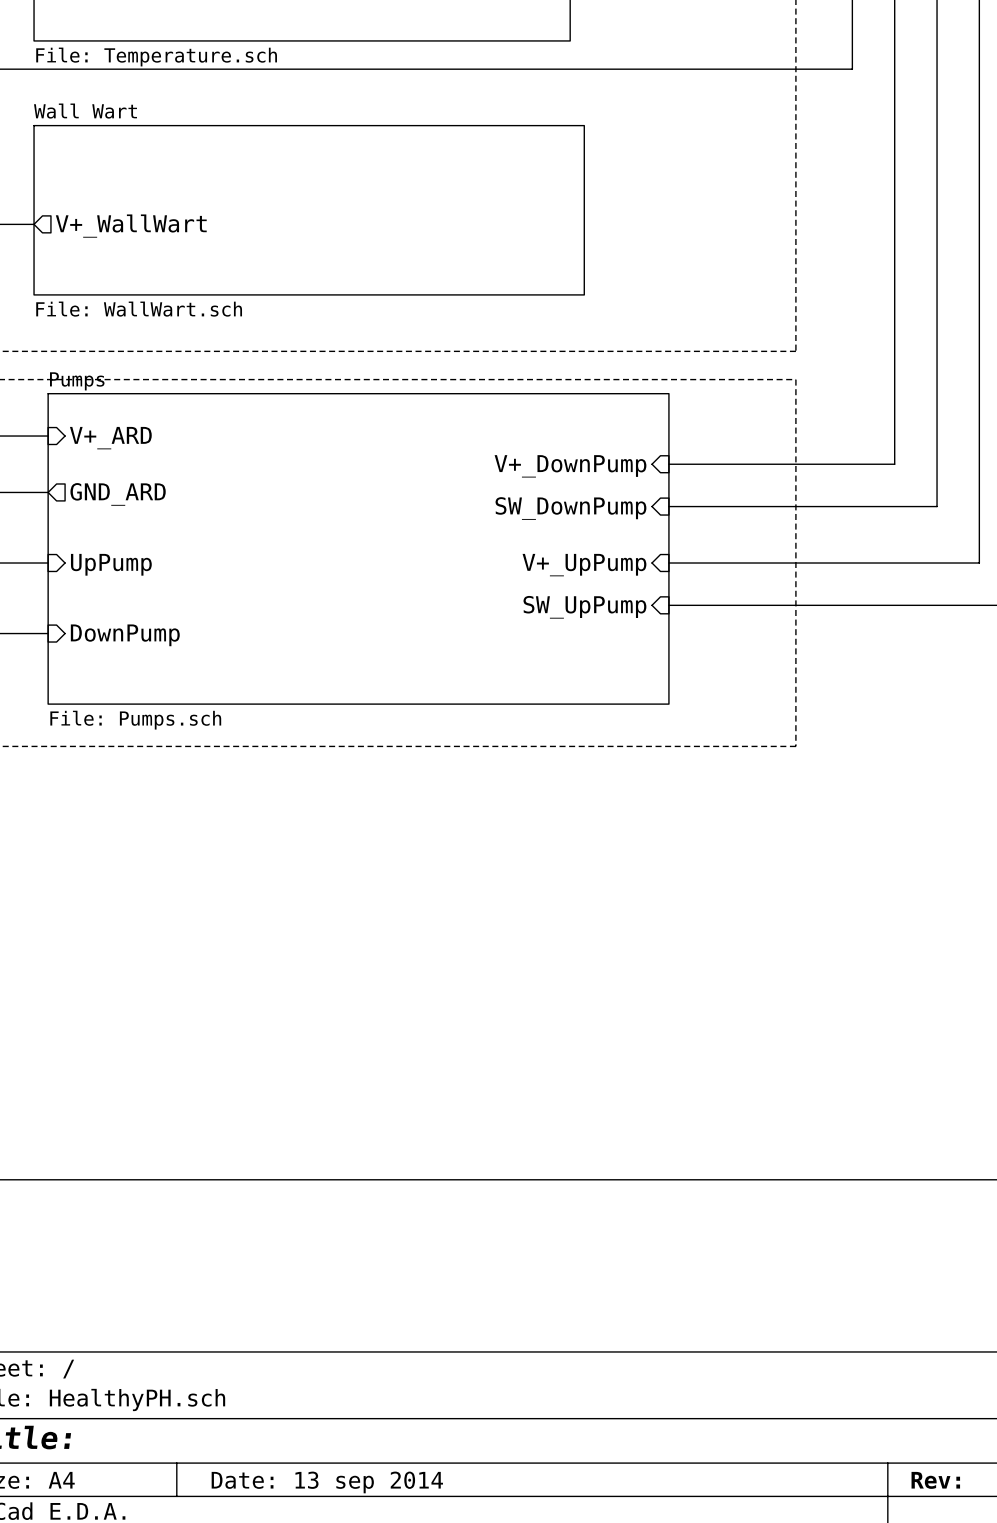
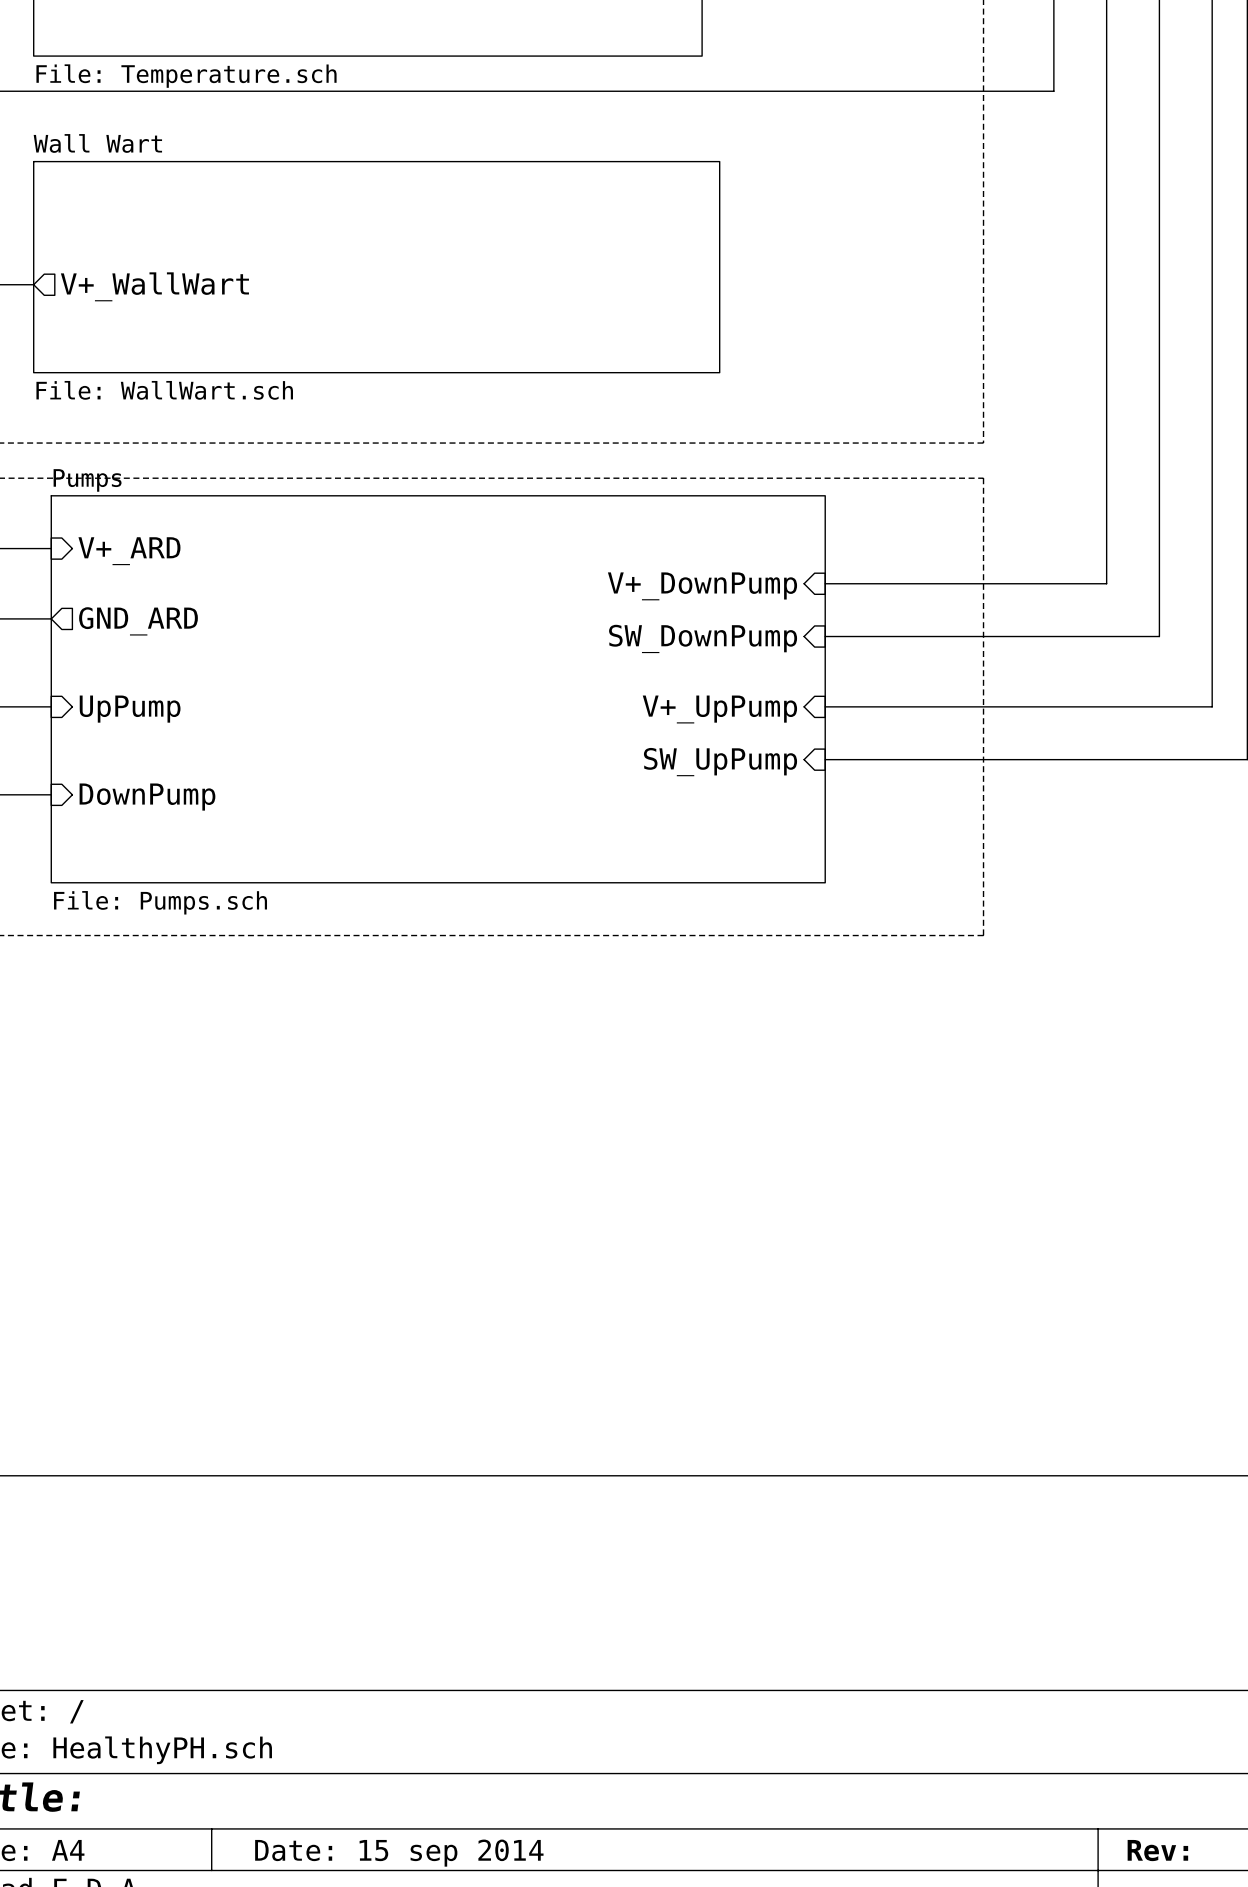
title block: Date: 13 sep 2014 (327, 1482) -> Date: 15 sep 2014 (399, 1853)

